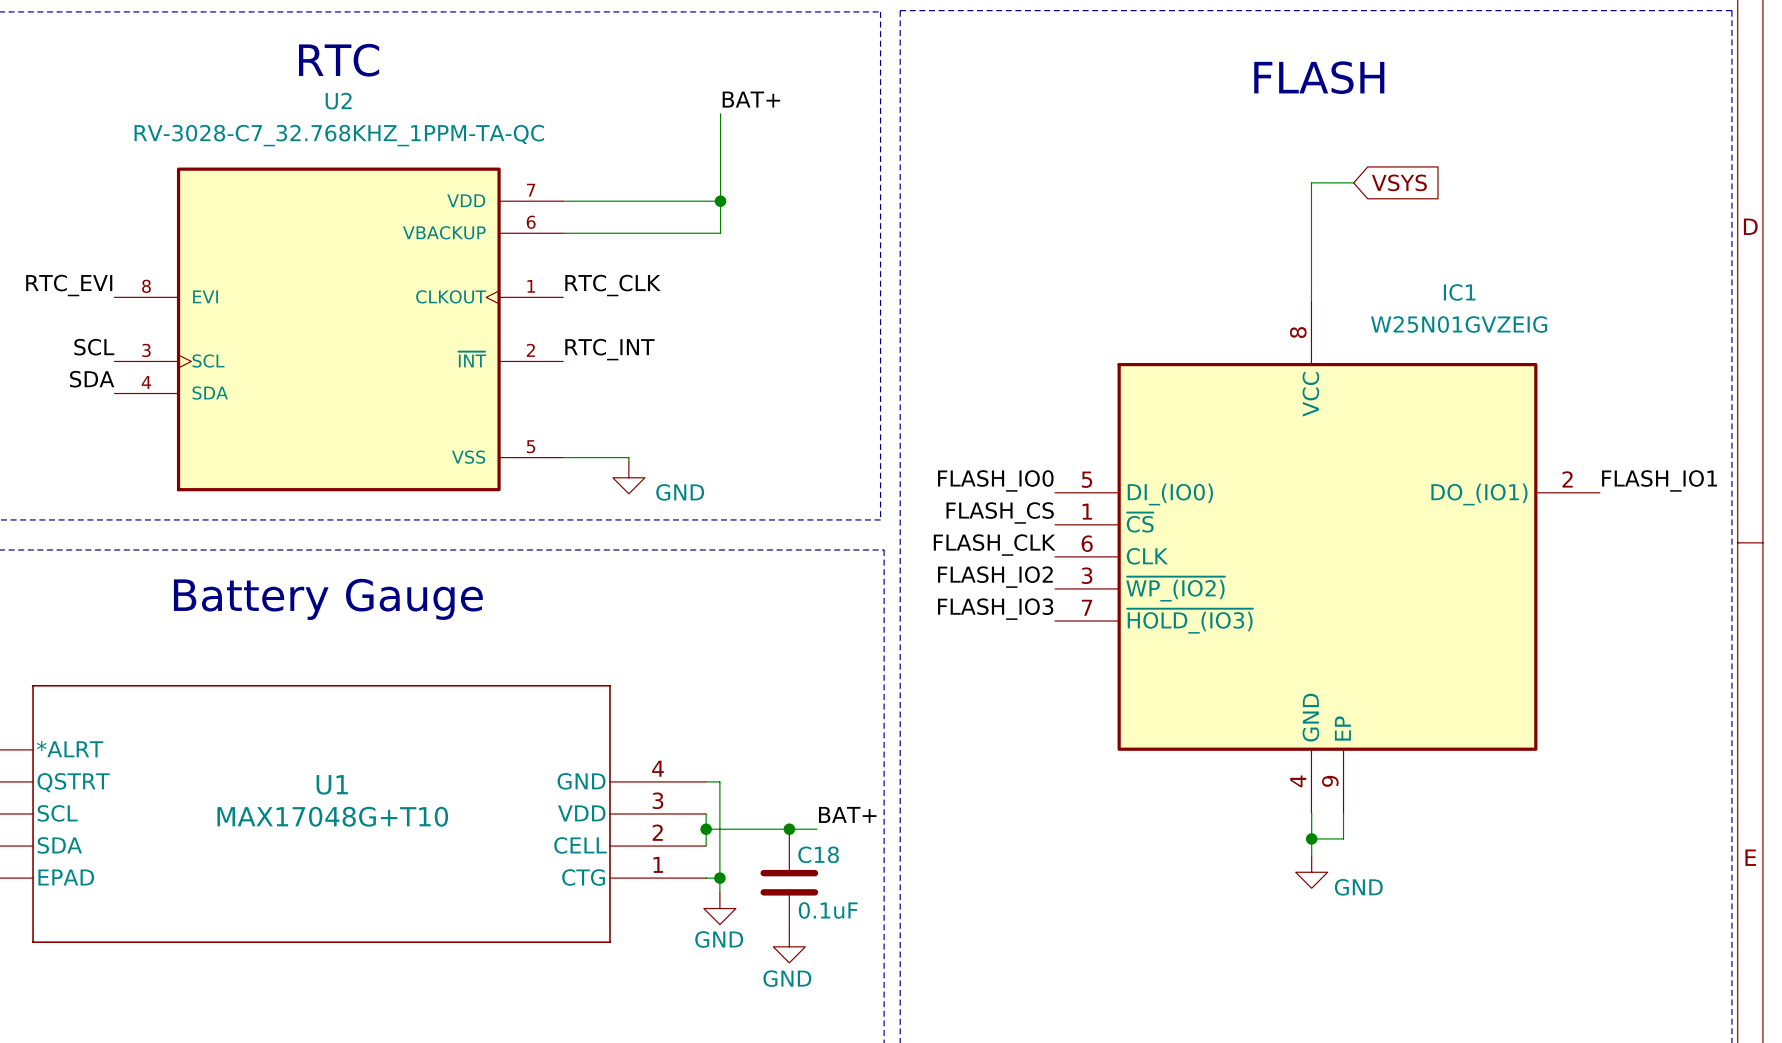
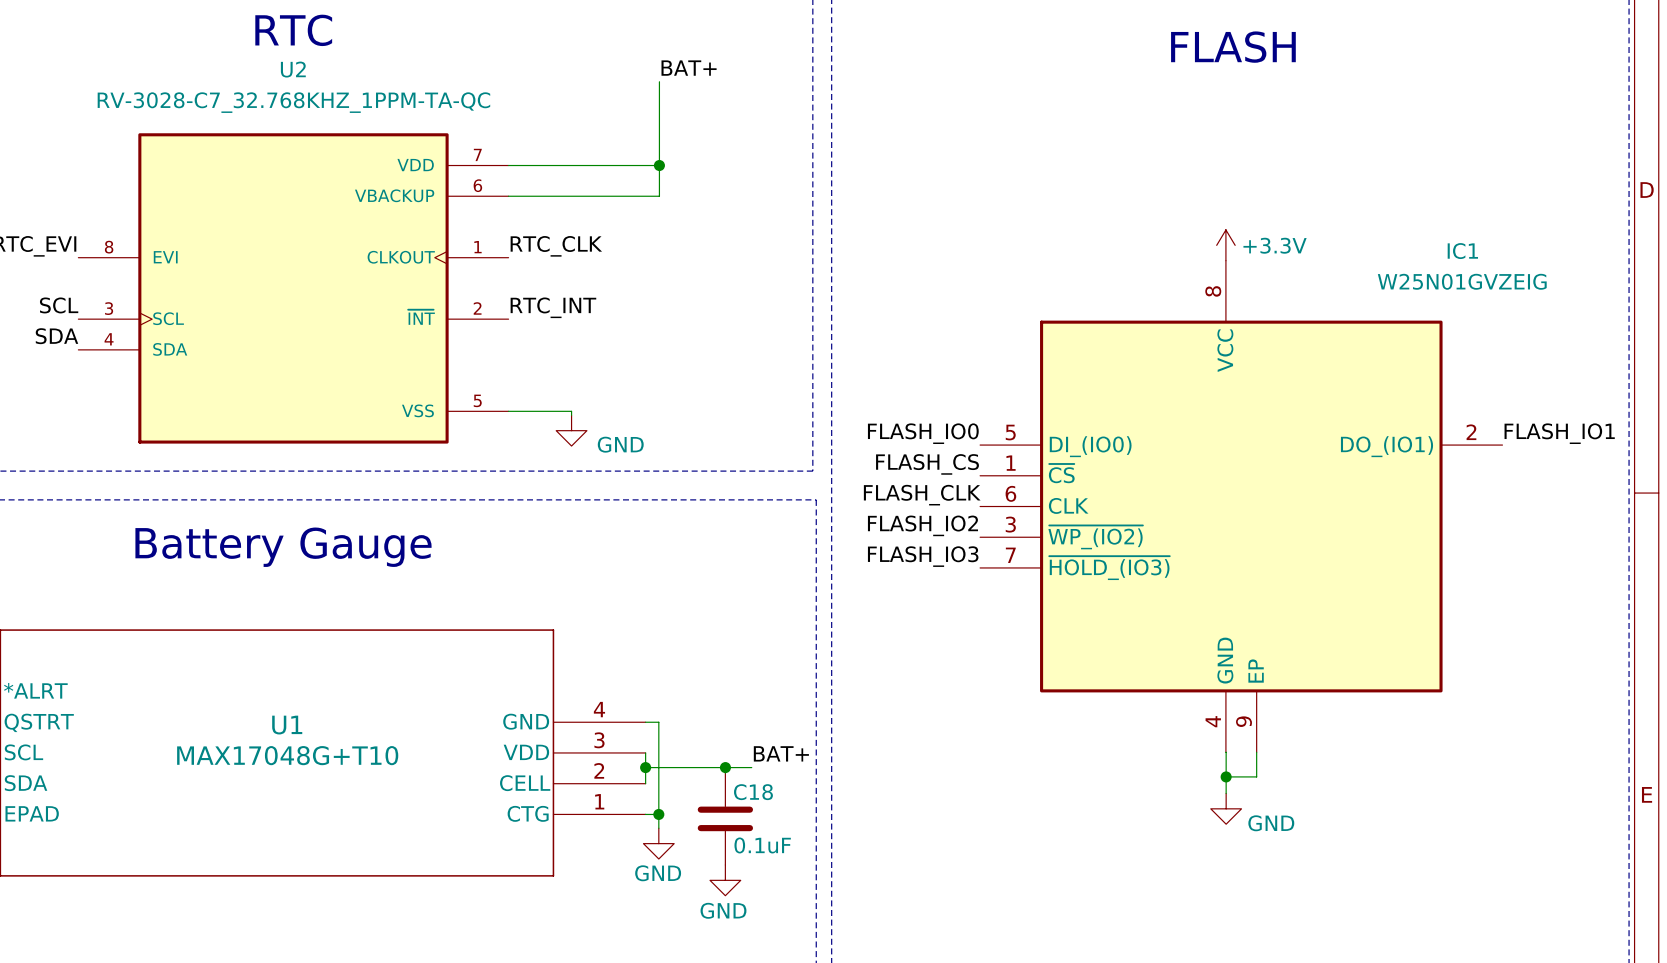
wire: (1353, 182) (1311, 182) (1311, 300) -> none
global label: VSYS (1399, 182) -> none
power symbol: none -> +3.3V (1225, 245)
IC1 name position: IC1 (1459, 292) -> IC1 (1462, 251)
IC1 value position: W25N01GVZEIG (1459, 324) -> W25N01GVZEIG (1462, 281)

